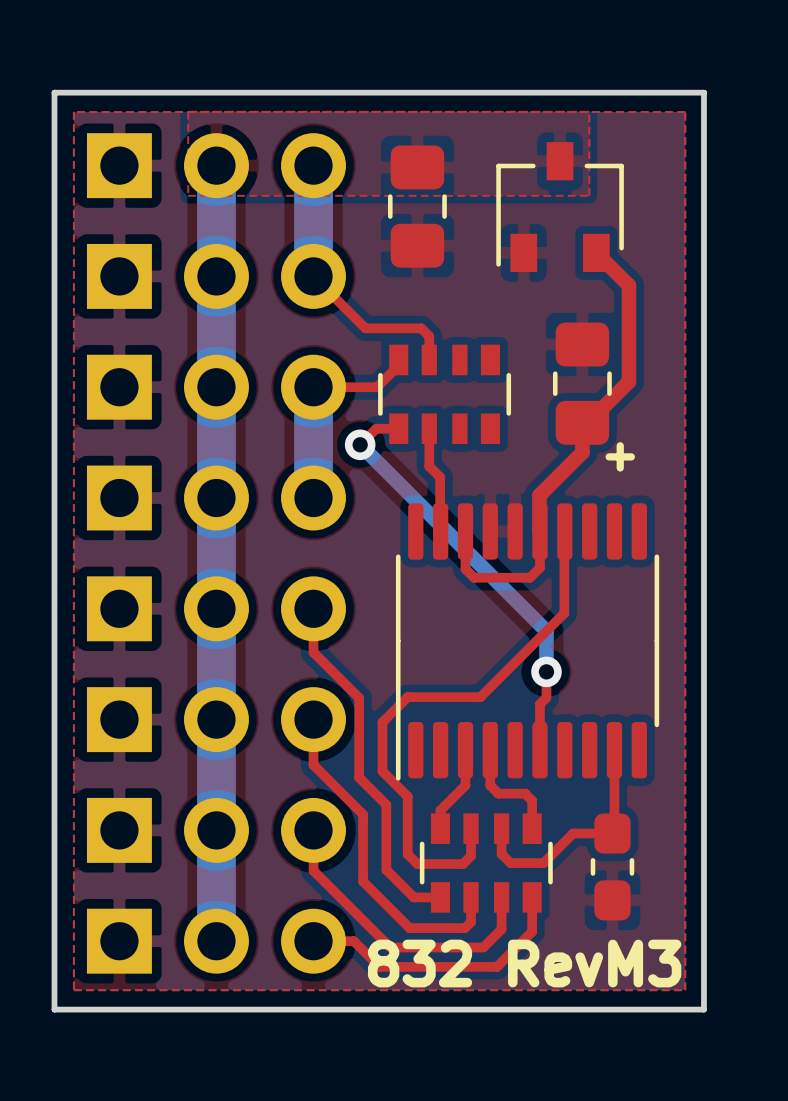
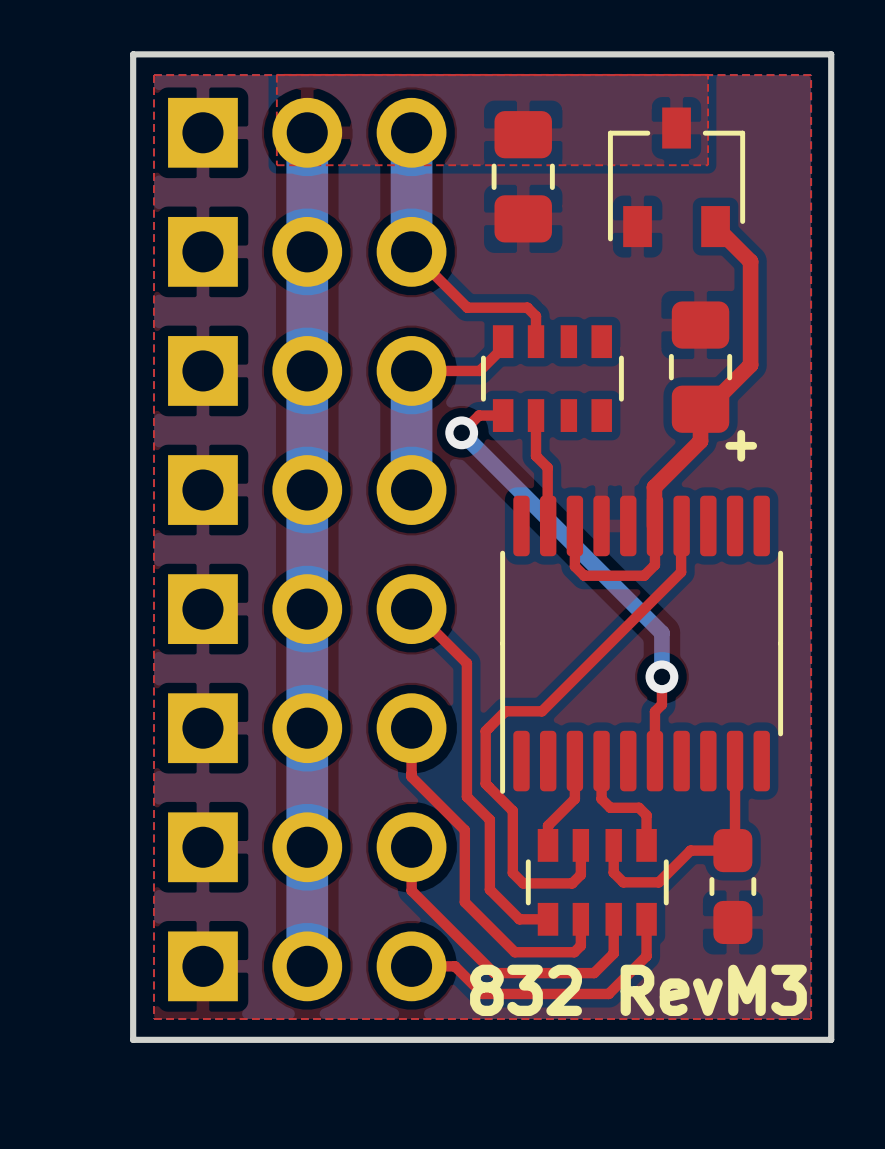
top track: (564, 574) (564, 613) (480, 697) (407, 697) (400, 703) -> (681, 572) (542, 711) (505, 711)
top track: (313, 608) (313, 652) (359, 698) (359, 777) (365, 783) -> (411, 609) (466, 663) (466, 796)

